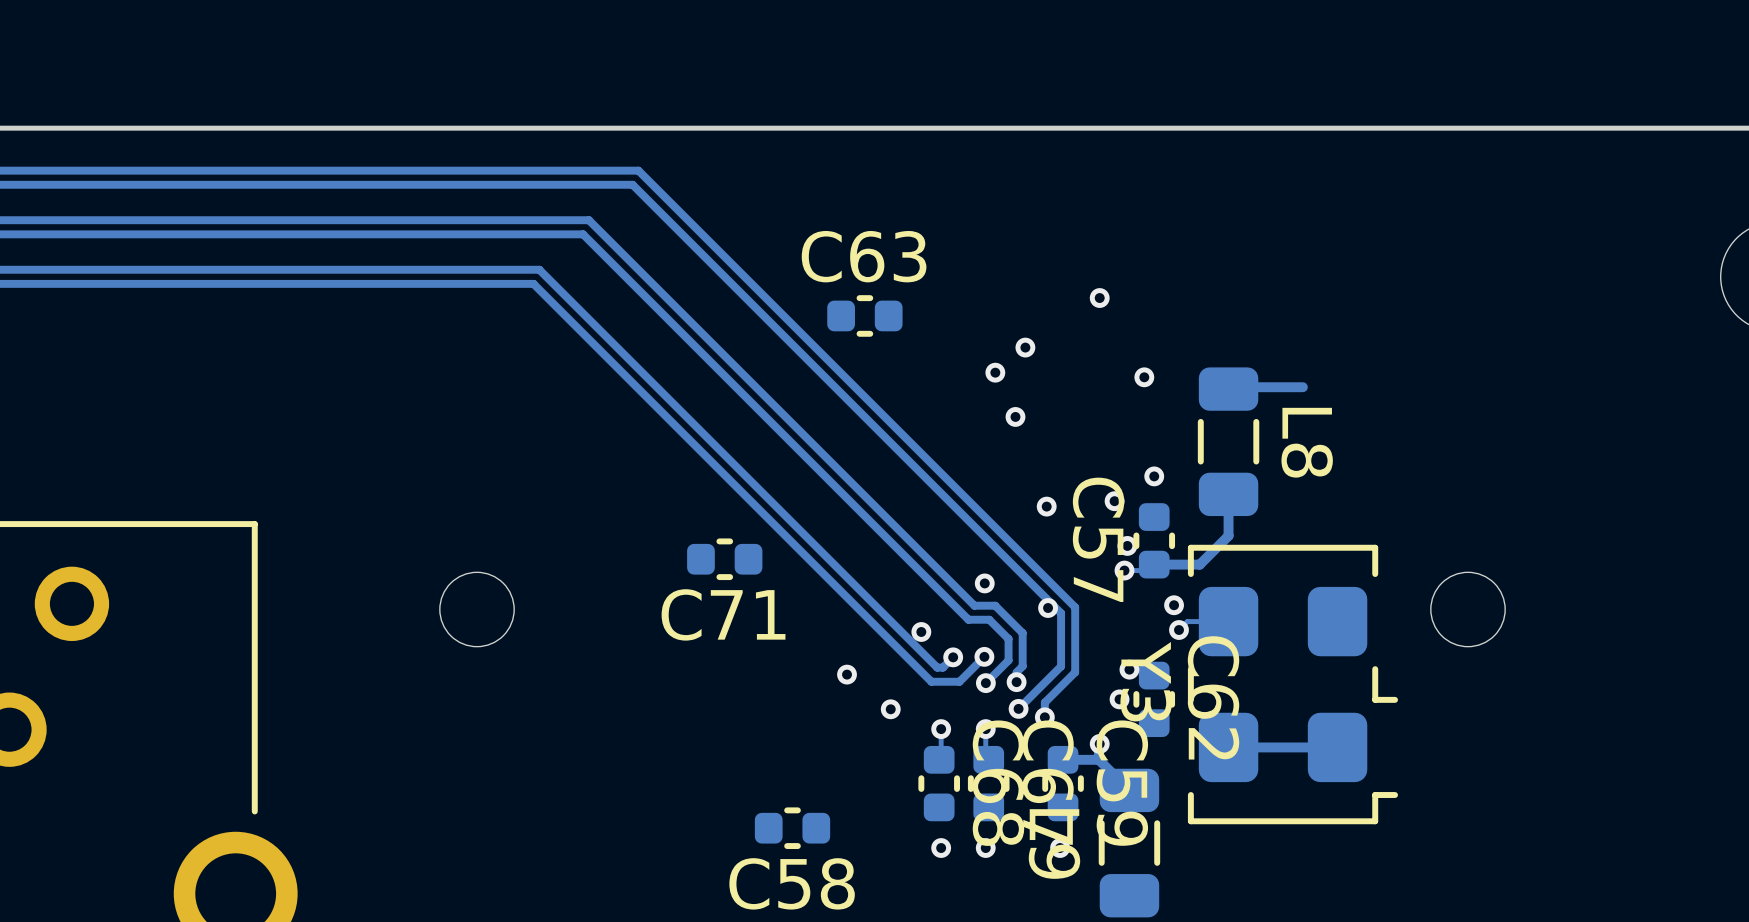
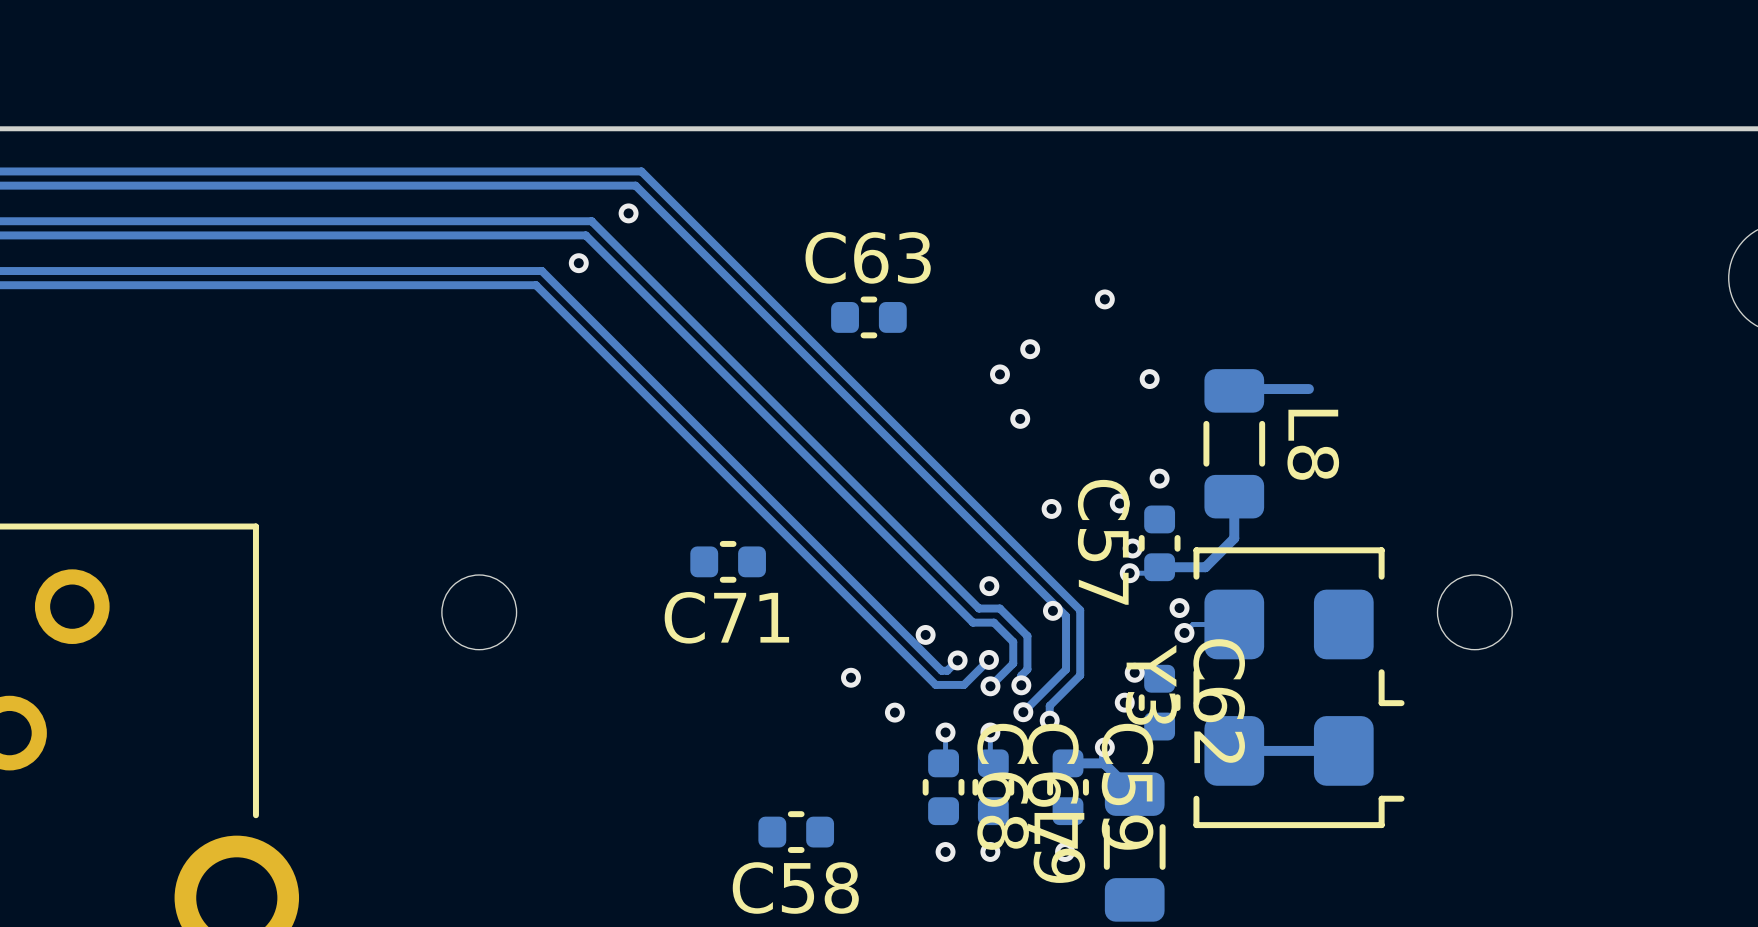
via: none -> (628, 213)
via: none -> (578, 263)

